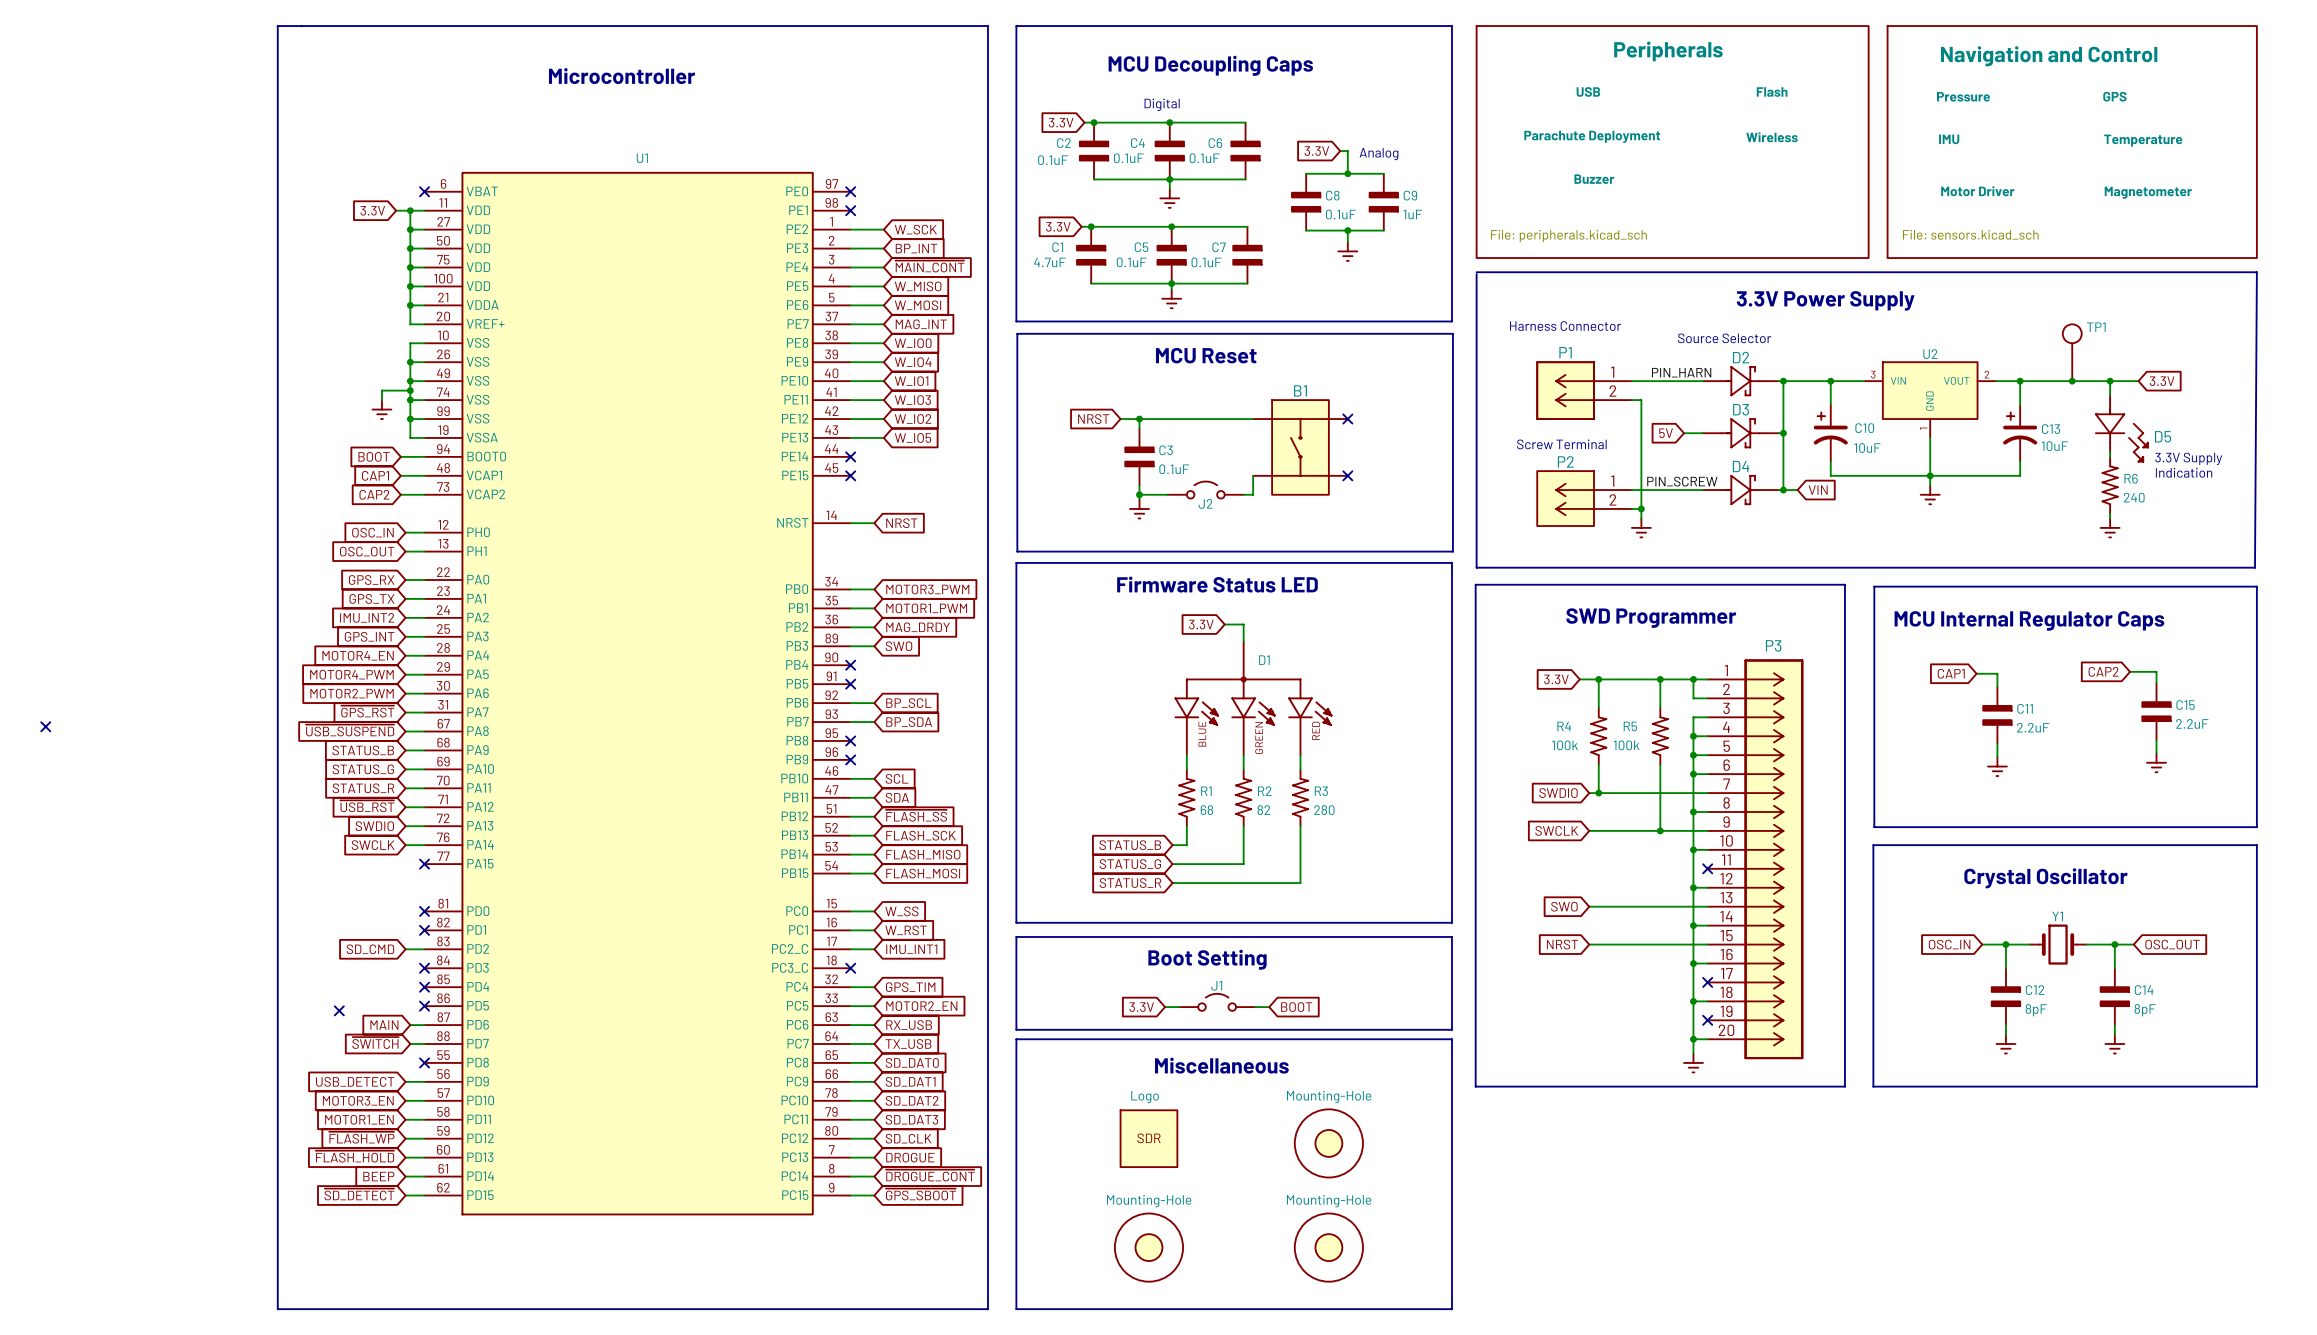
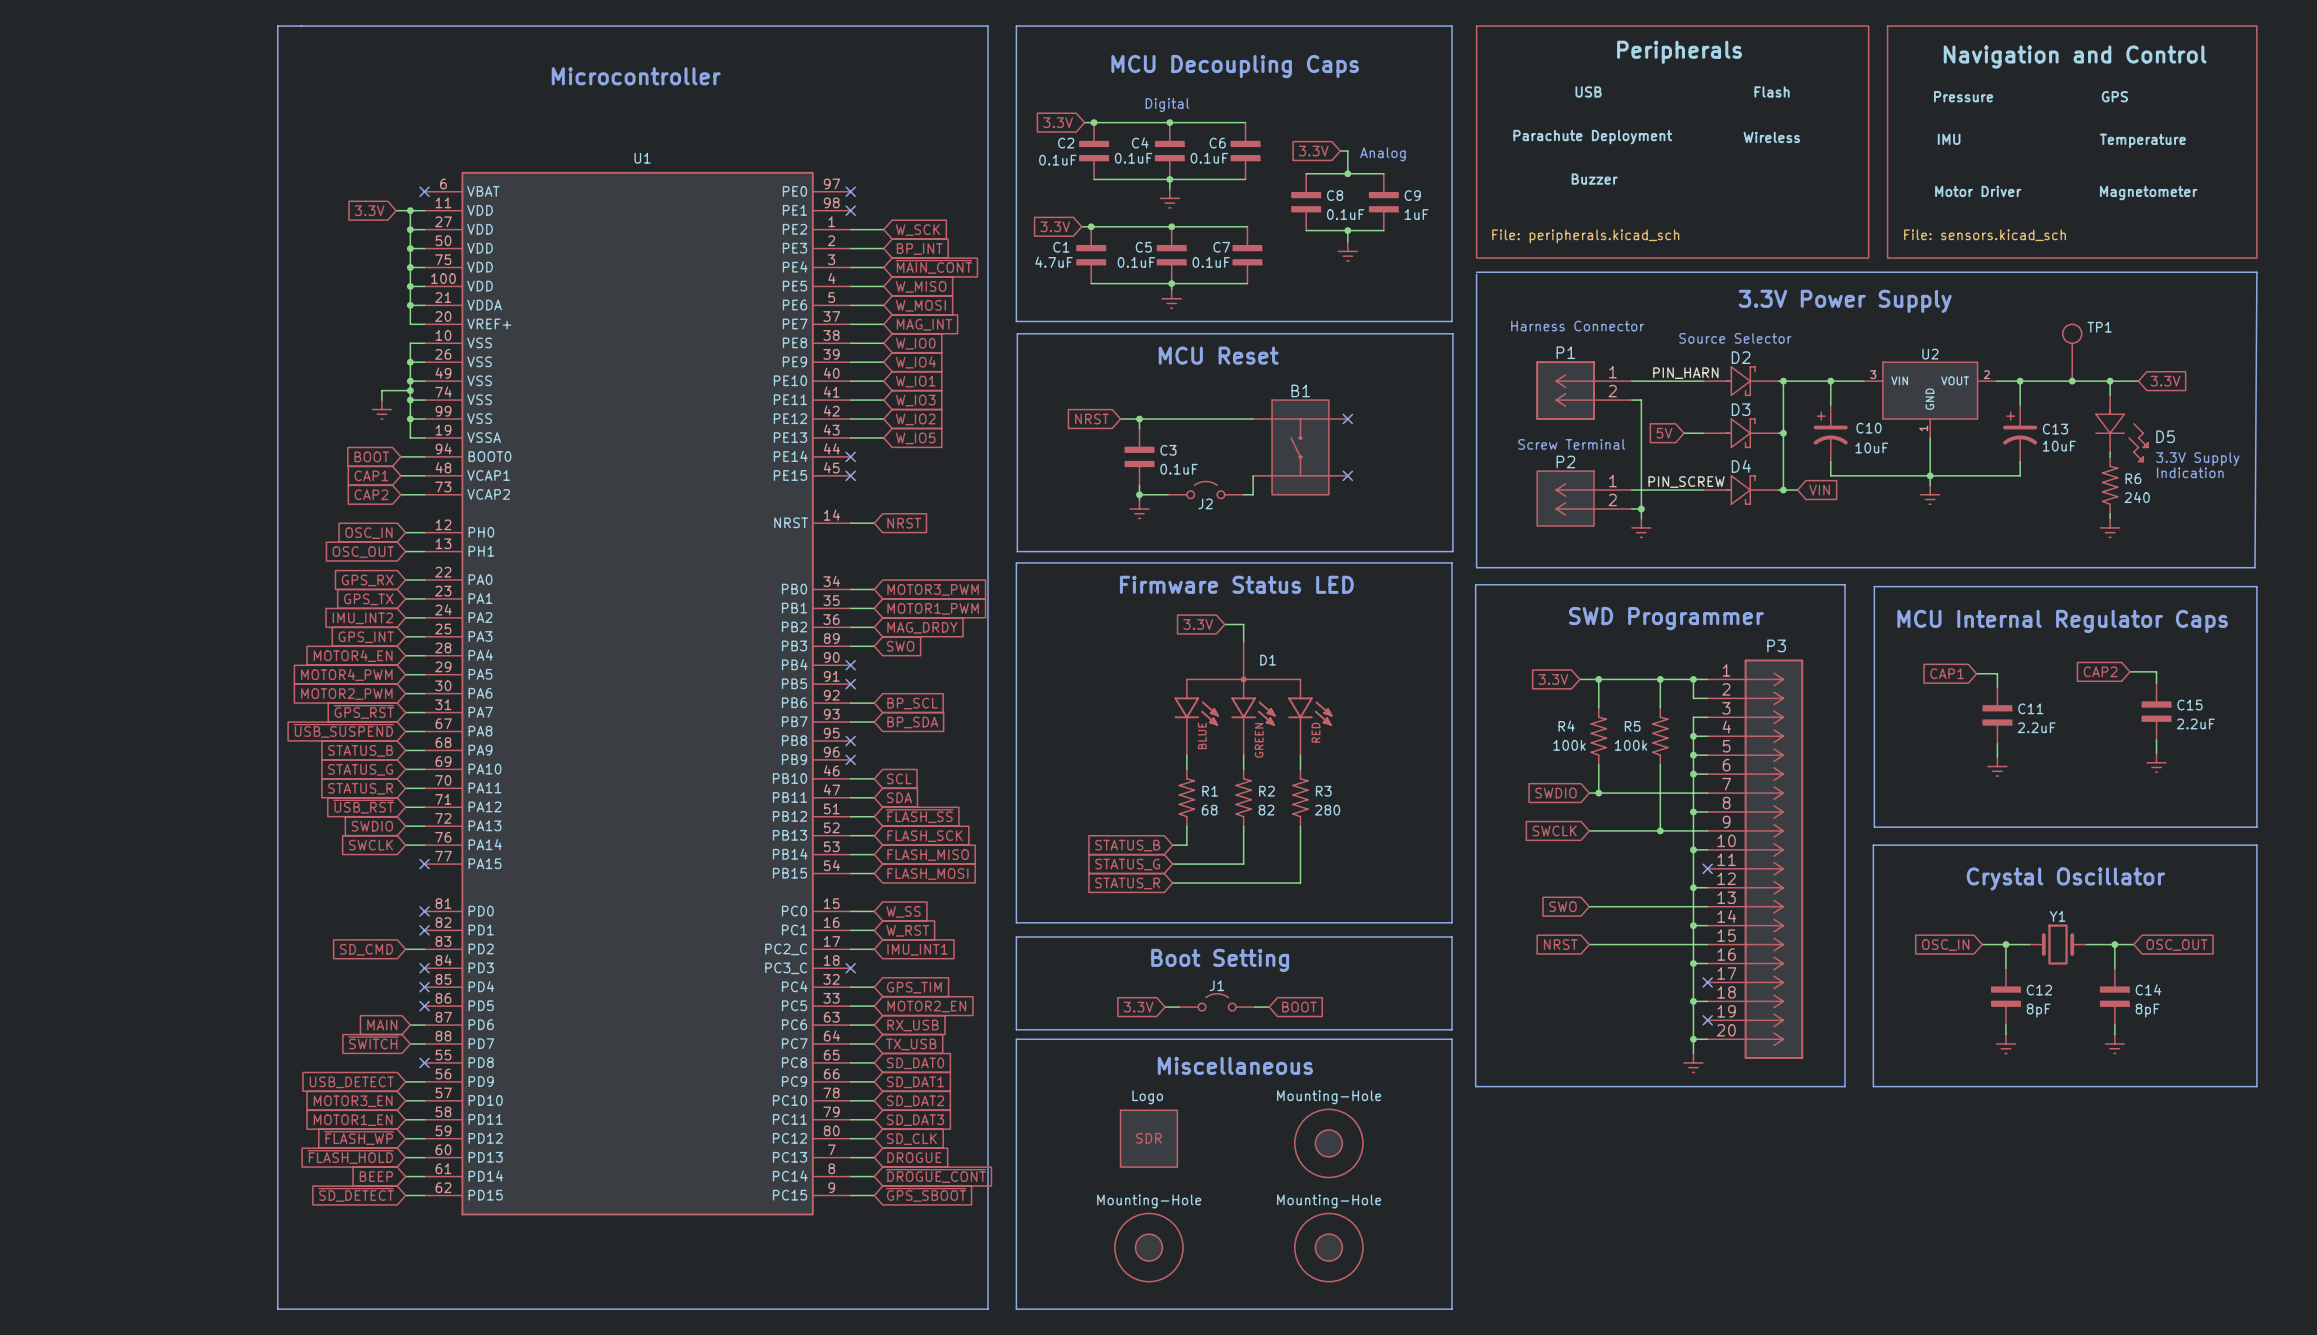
no-connect mark: (45, 726) -> none
no-connect mark: (339, 1010) -> none

